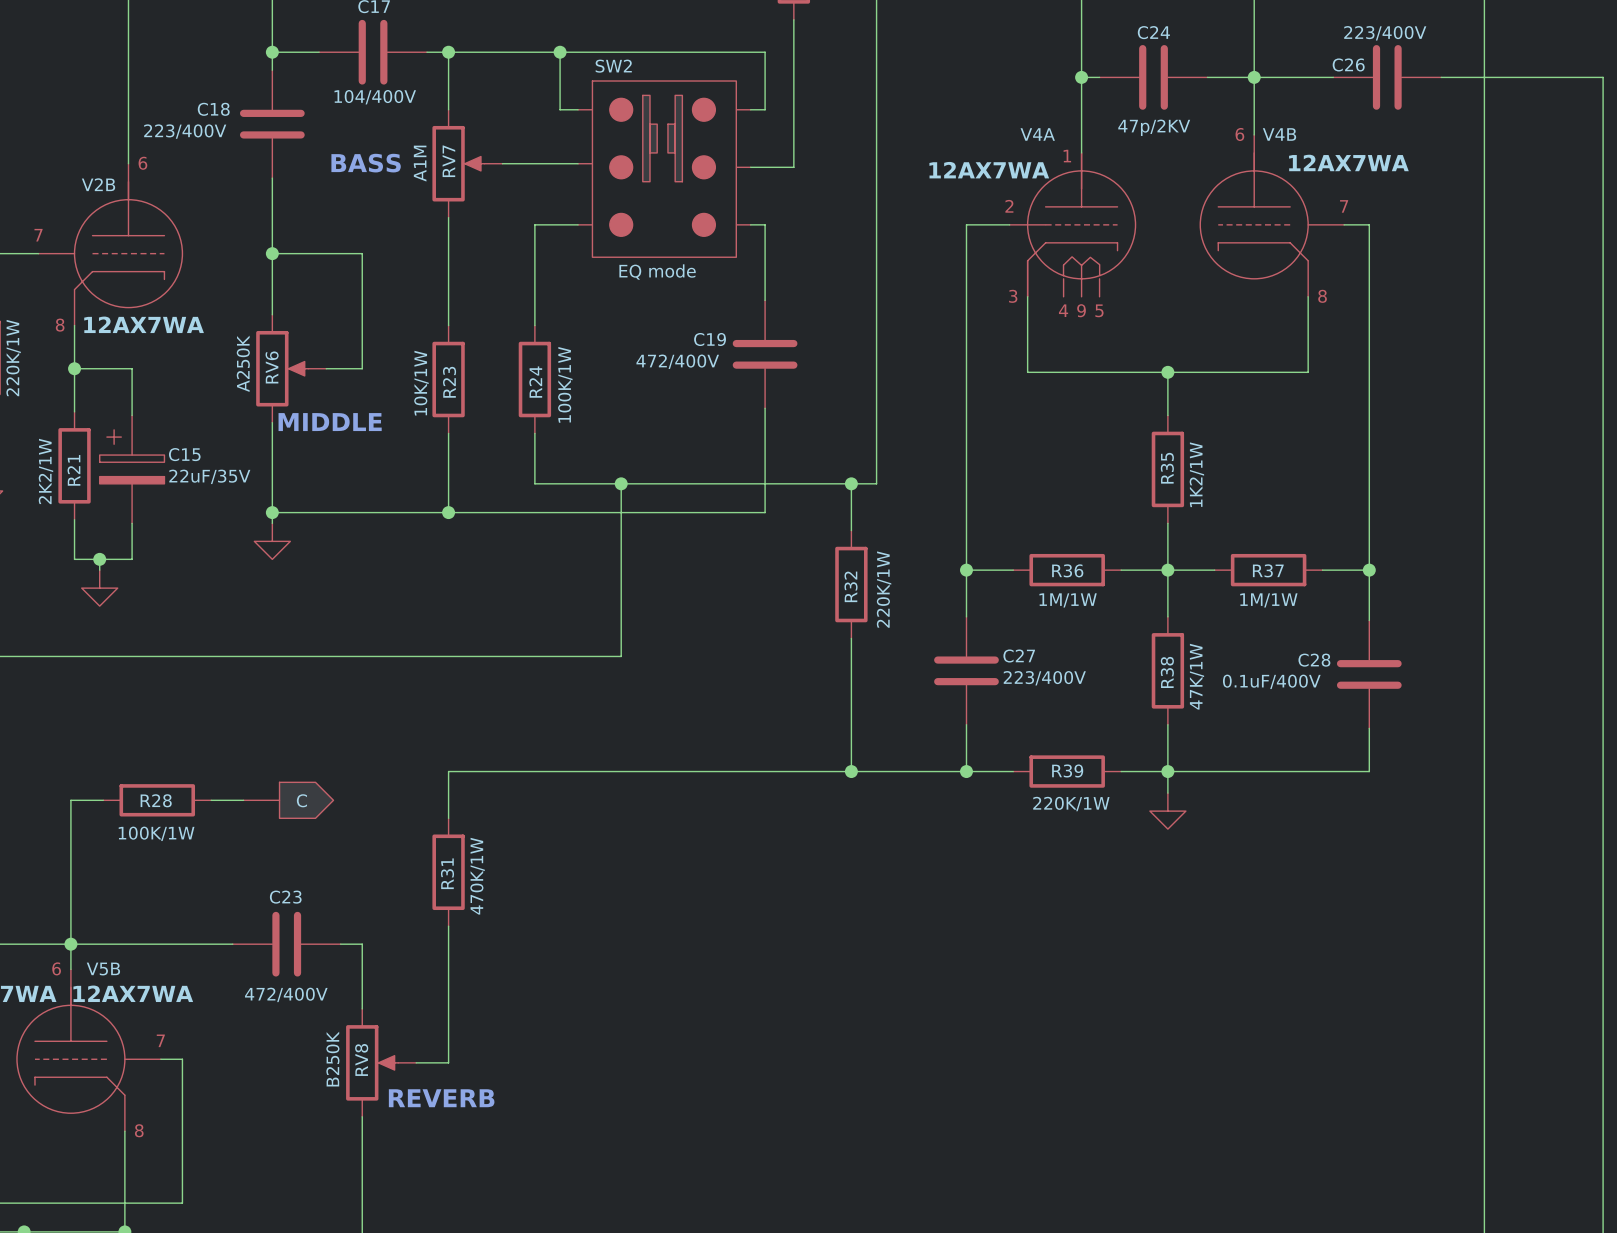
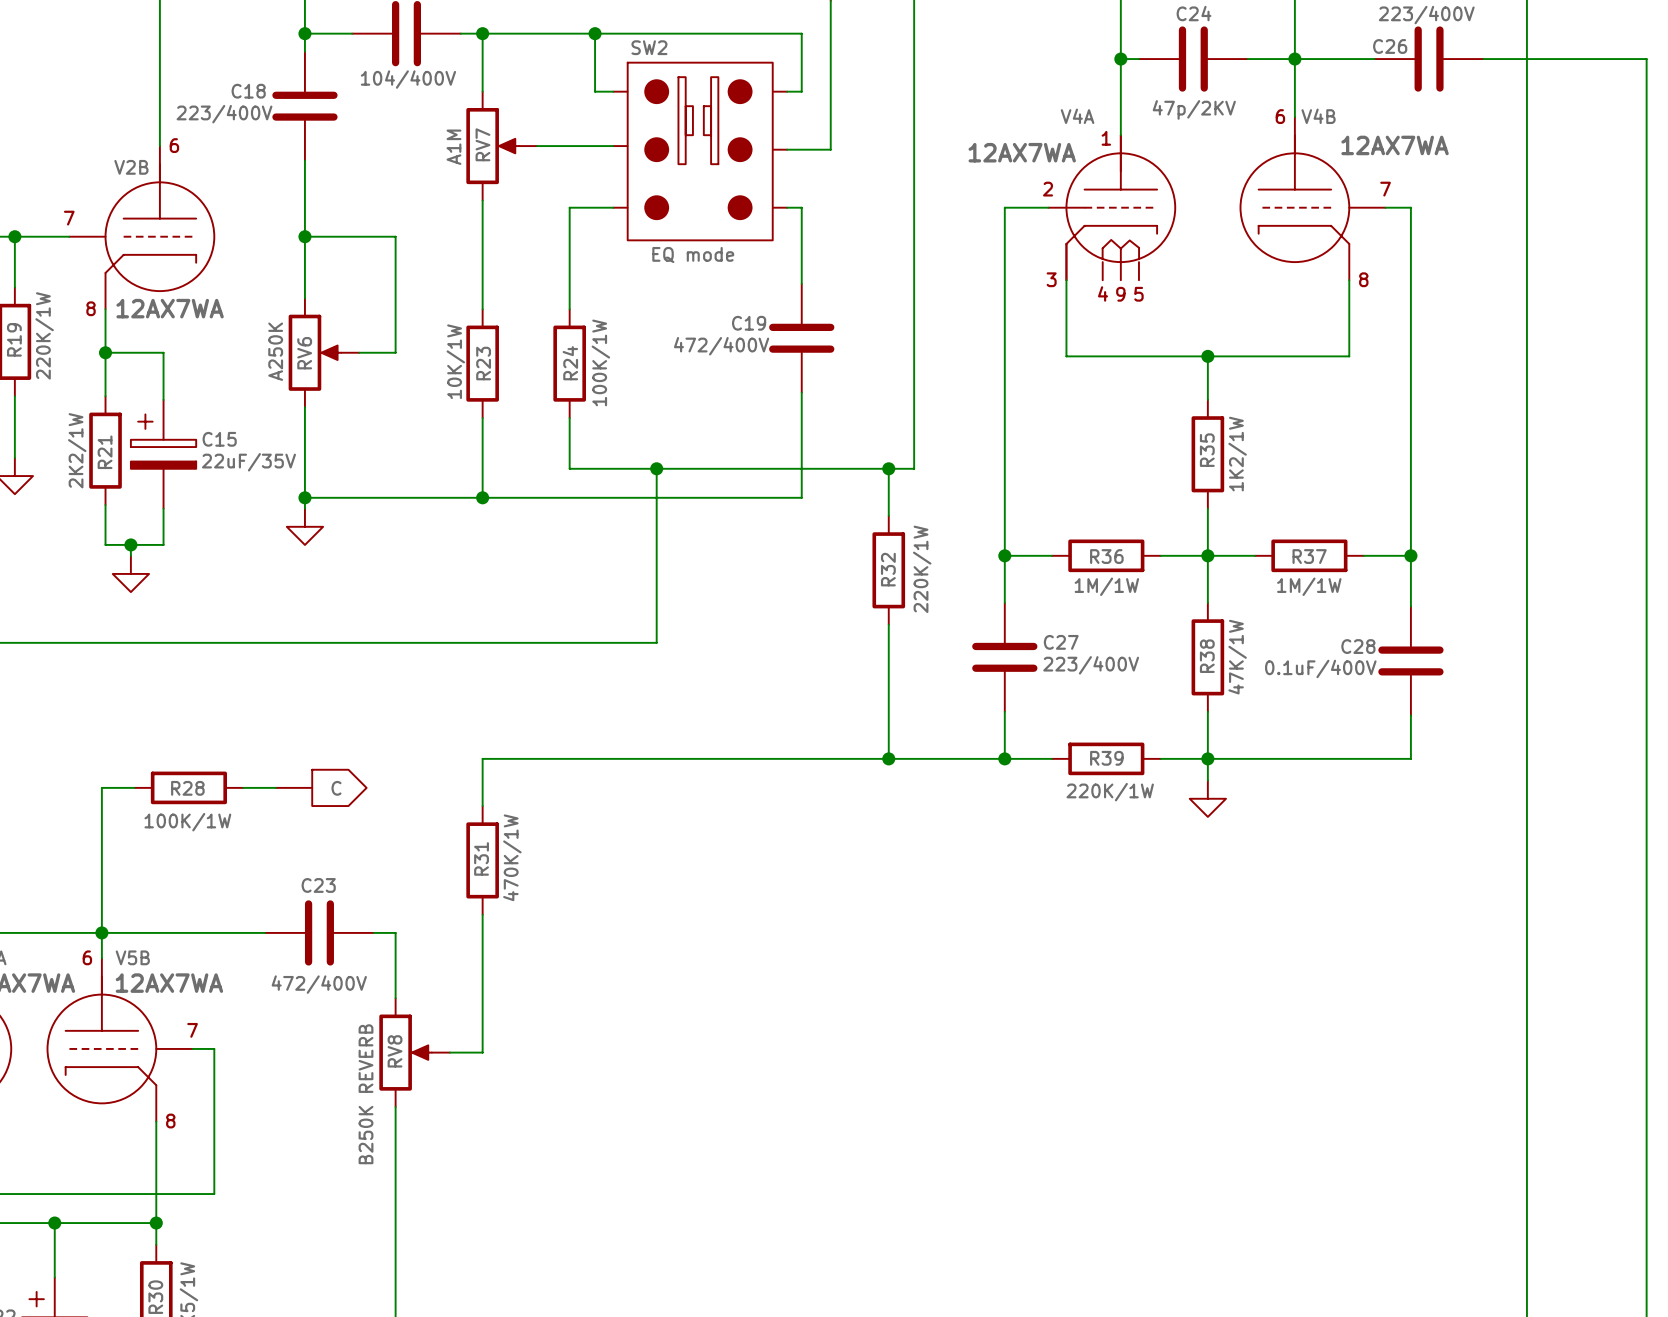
text: BASS (366, 163) -> none
text: MIDDLE (330, 422) -> none
RV8 value: B250K (332, 1059) -> B250K REVERB (366, 1094)
text: REVERB (441, 1098) -> none

